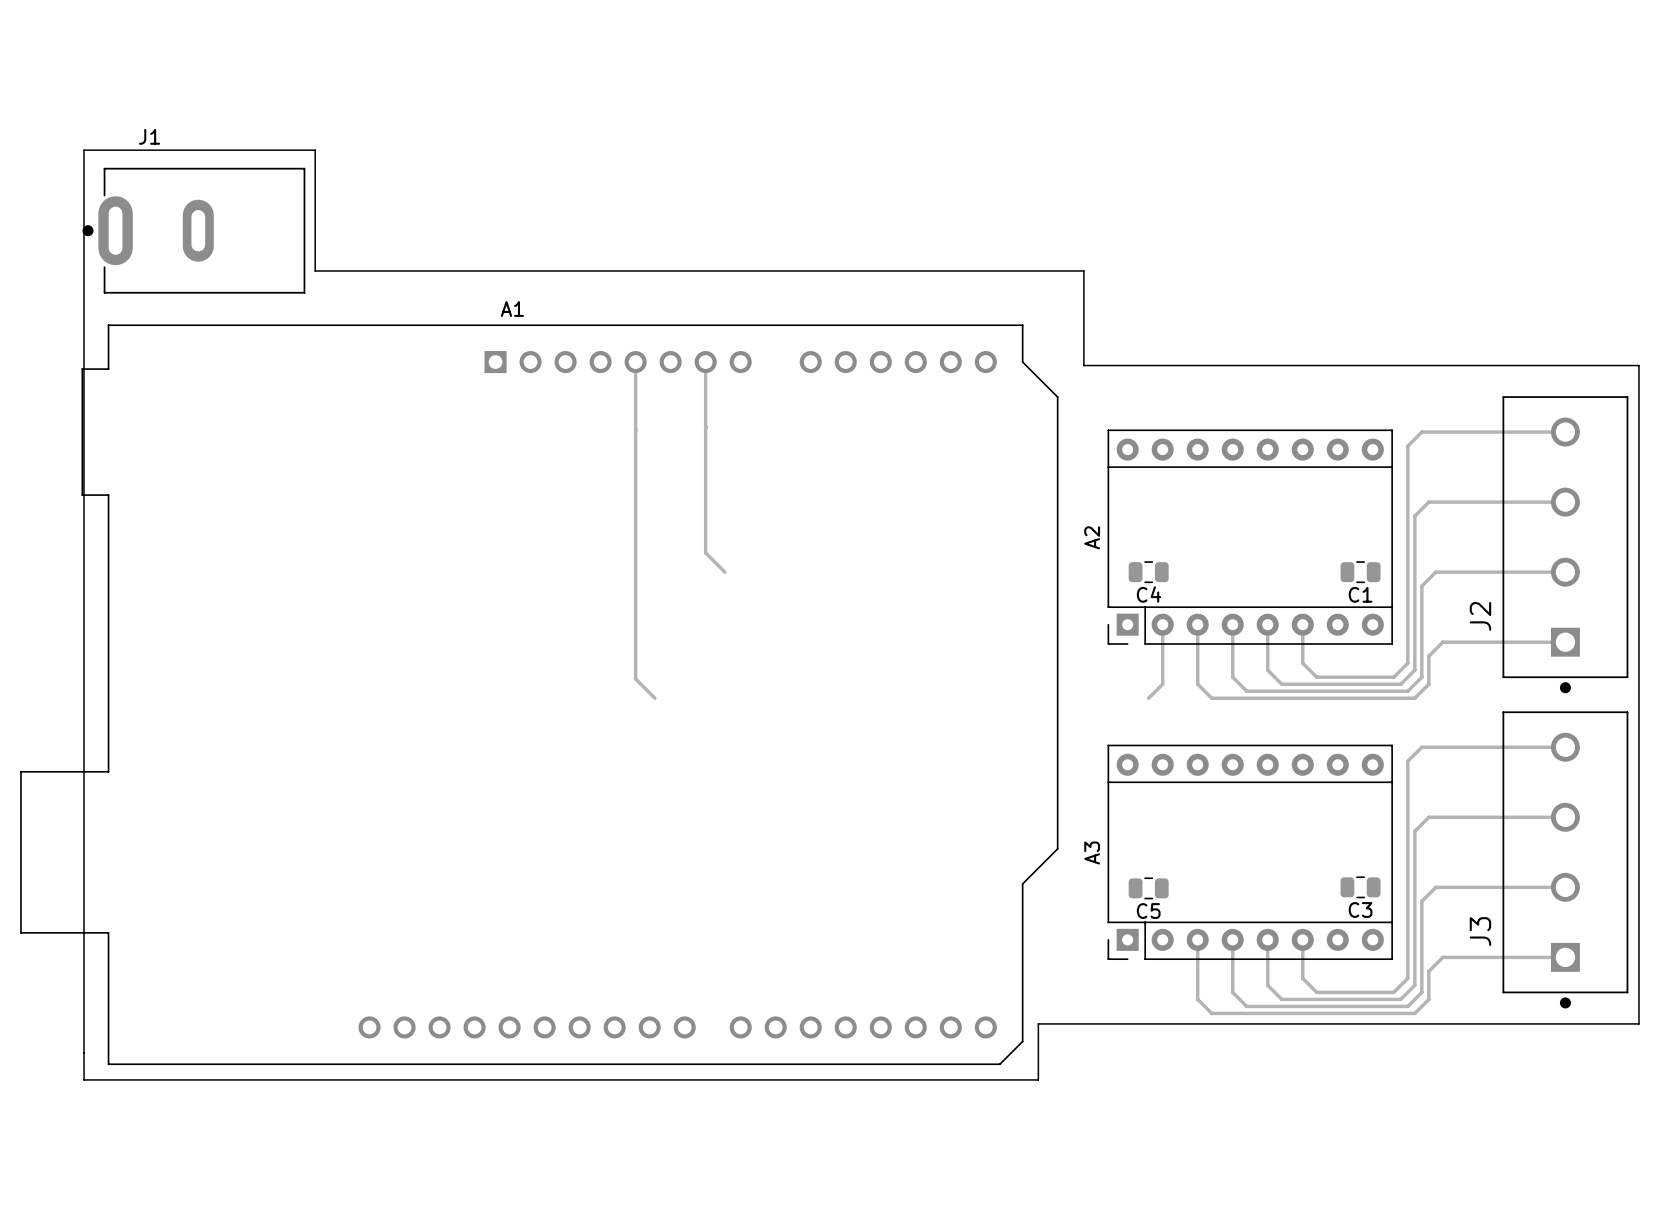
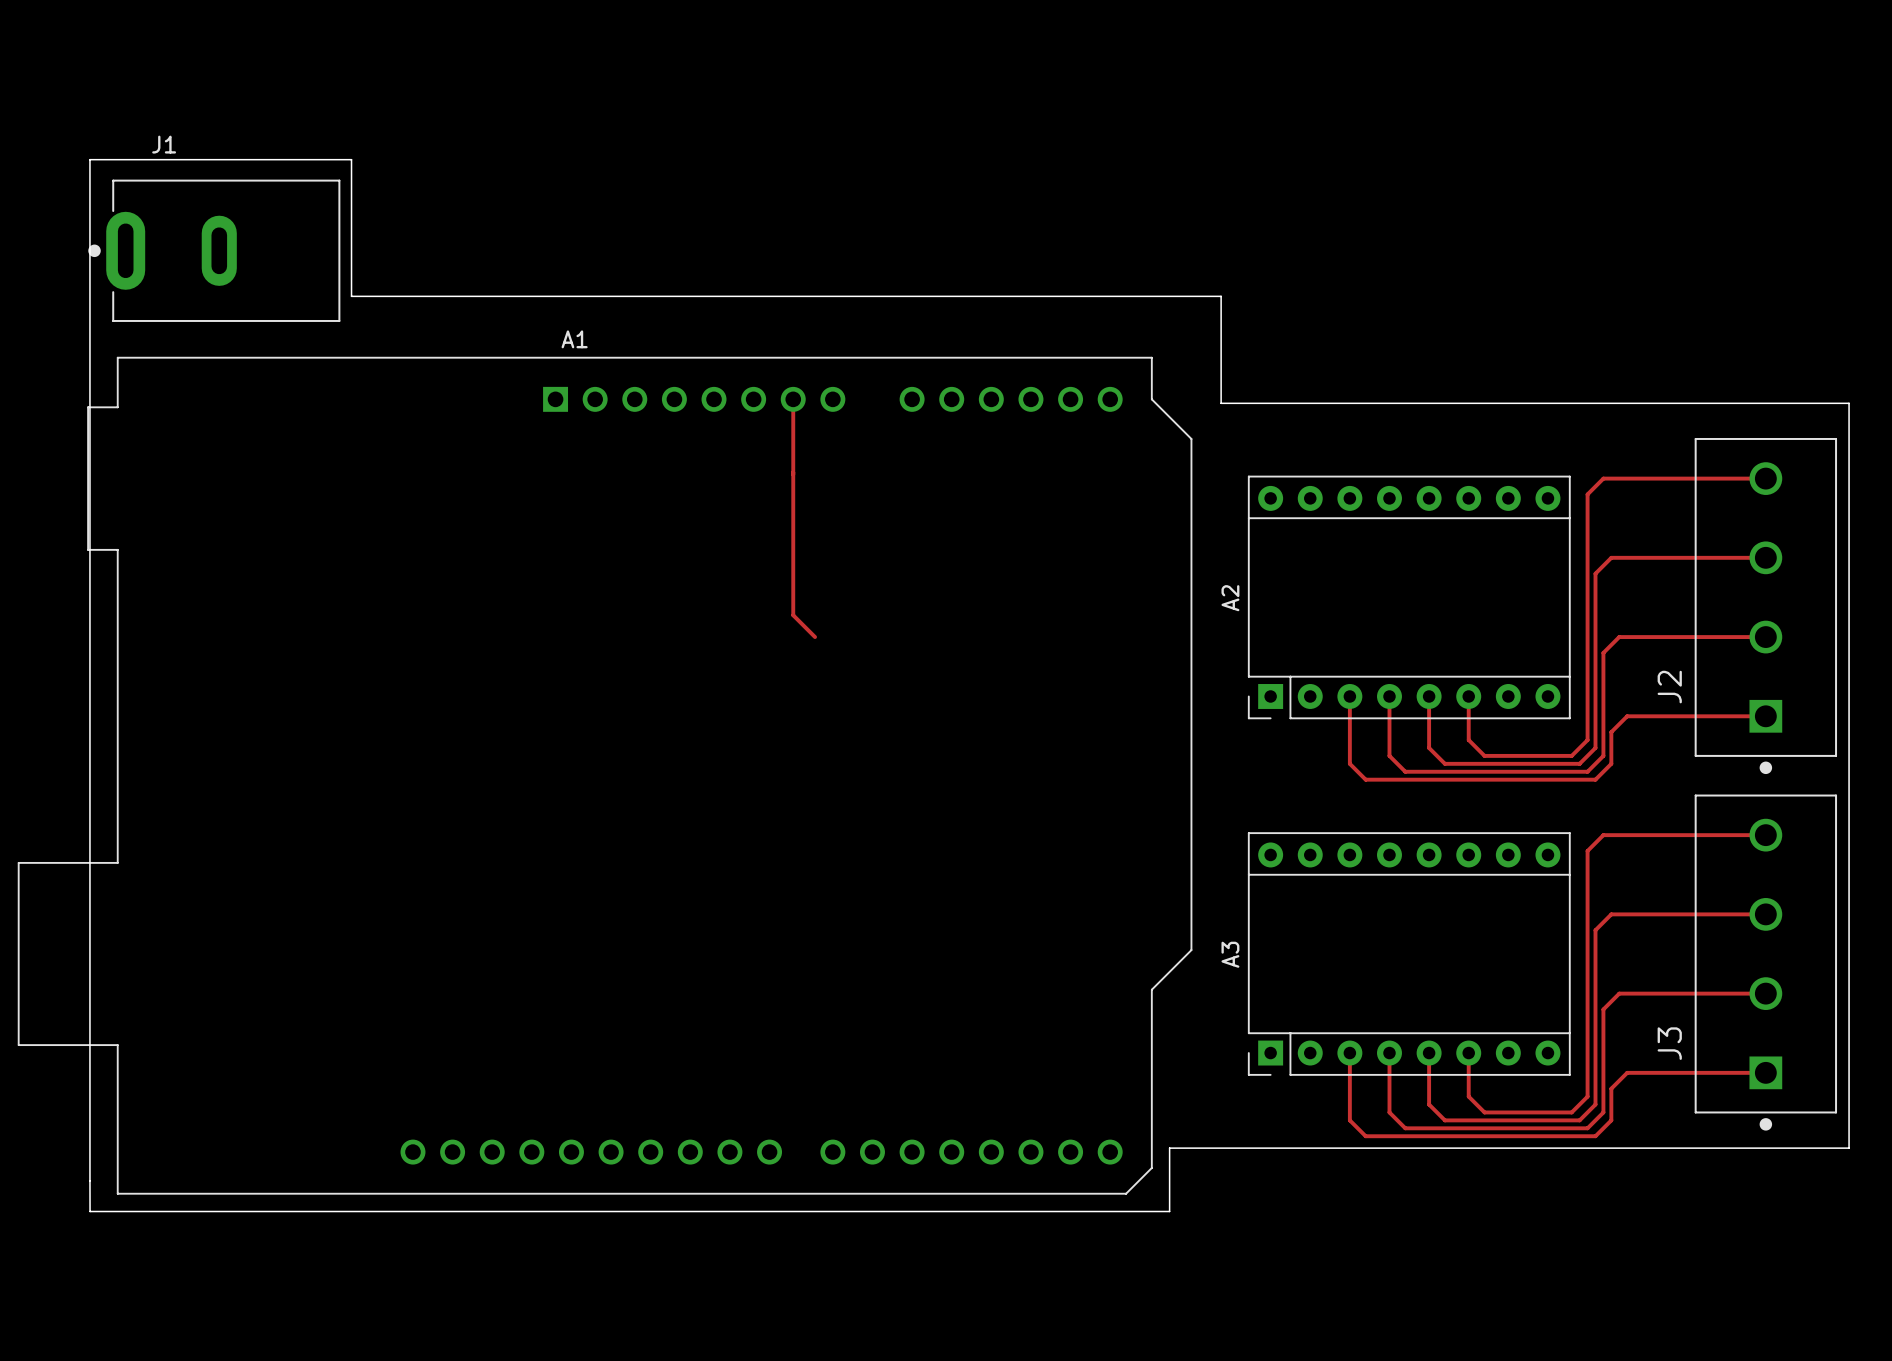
track: (635, 362) (635, 678) (654, 698) -> none
C4: (1148, 572) -> none
C1: (1360, 572) -> none
track: (1162, 624) (1162, 684) (1148, 698) -> none
C3: (1360, 887) -> none
C5: (1148, 888) -> none

